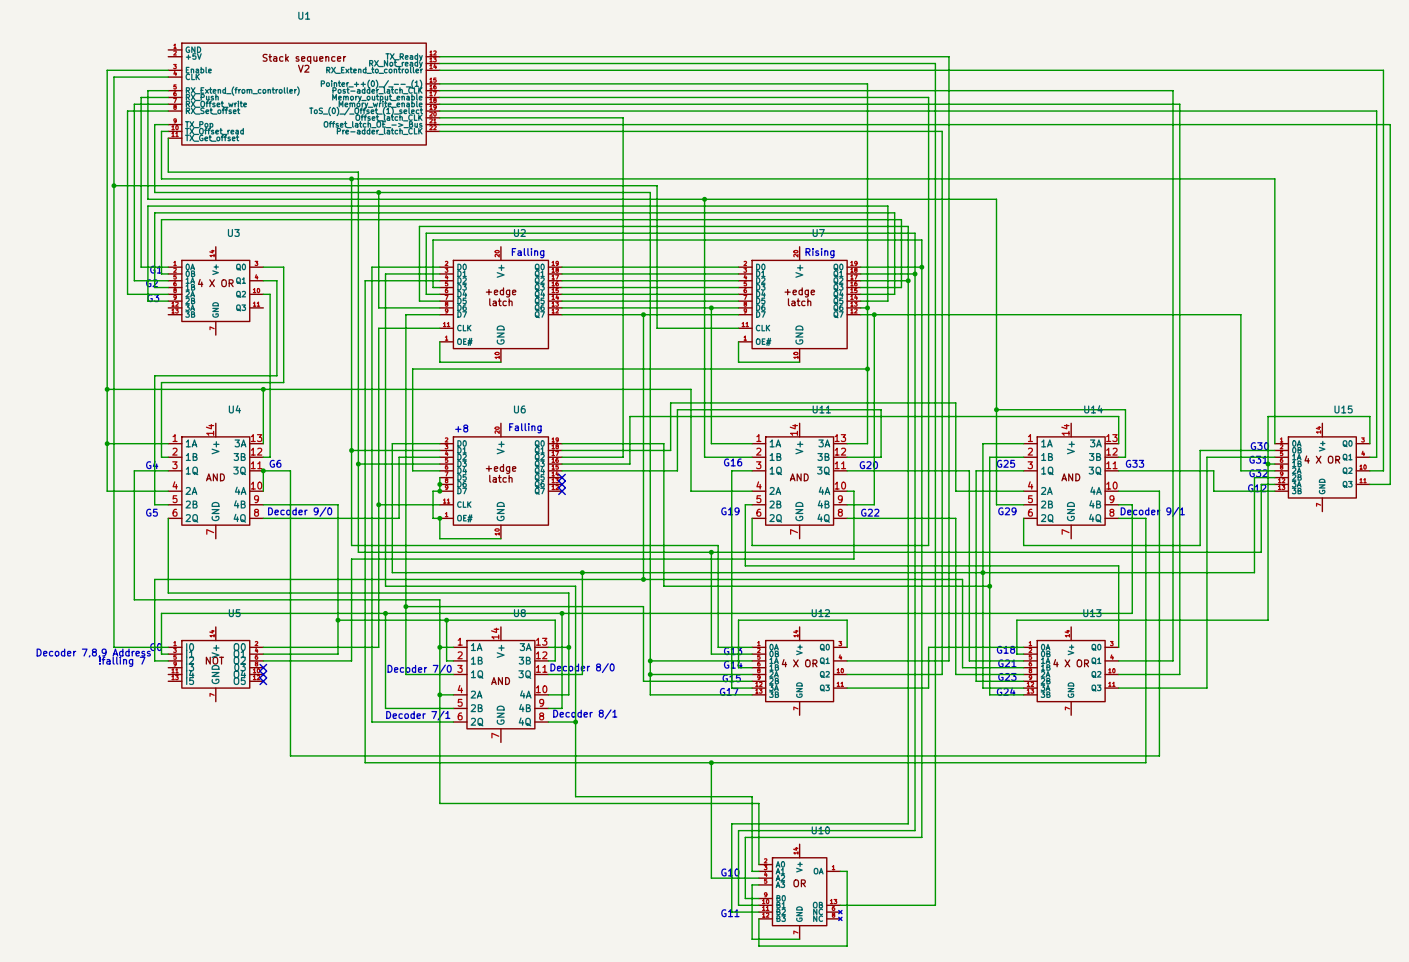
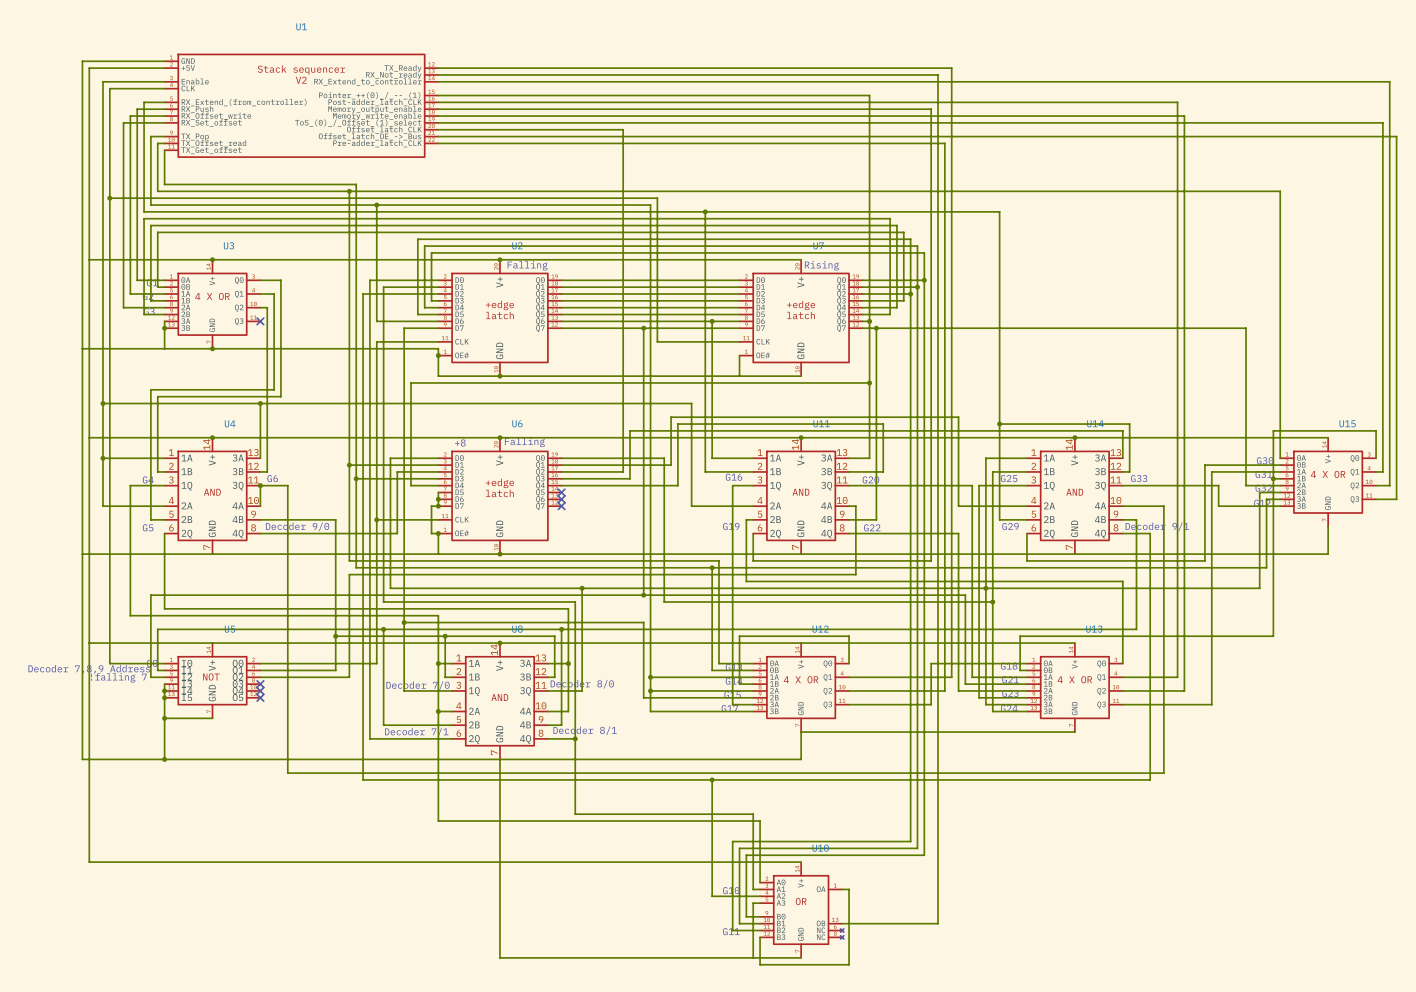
wire: none -> (164, 61) (82, 61) (82, 759) (801, 759) (801, 732) (1074, 732)
wire: none -> (164, 68) (89, 68) (89, 862) (801, 862)
wire: none -> (89, 259) (801, 259)
junction: none -> (212, 259)
junction: none -> (499, 259)
wire: none -> (164, 321) (164, 348)
no-connect mark: none -> (260, 321)
junction: none -> (164, 328)
wire: none -> (82, 348) (438, 348) (438, 355)
junction: none -> (212, 348)
junction: none -> (438, 355)
wire: none -> (499, 376) (739, 376)
junction: none -> (499, 376)
wire: none -> (89, 437) (1328, 437)
junction: none -> (212, 437)
junction: none -> (499, 437)
junction: none -> (801, 437)
junction: none -> (1074, 437)
wire: none -> (1328, 526) (1328, 554) (499, 554)
wire: none -> (82, 554) (438, 554)
junction: none -> (499, 554)
wire: none -> (89, 643) (1074, 643)
junction: none -> (499, 643)
wire: none -> (164, 684) (164, 759)
junction: none -> (164, 690)
junction: none -> (164, 697)
wire: none -> (164, 718) (212, 718)
junction: none -> (164, 718)
junction: none -> (164, 759)
wire: none -> (499, 759) (499, 957) (753, 957)

